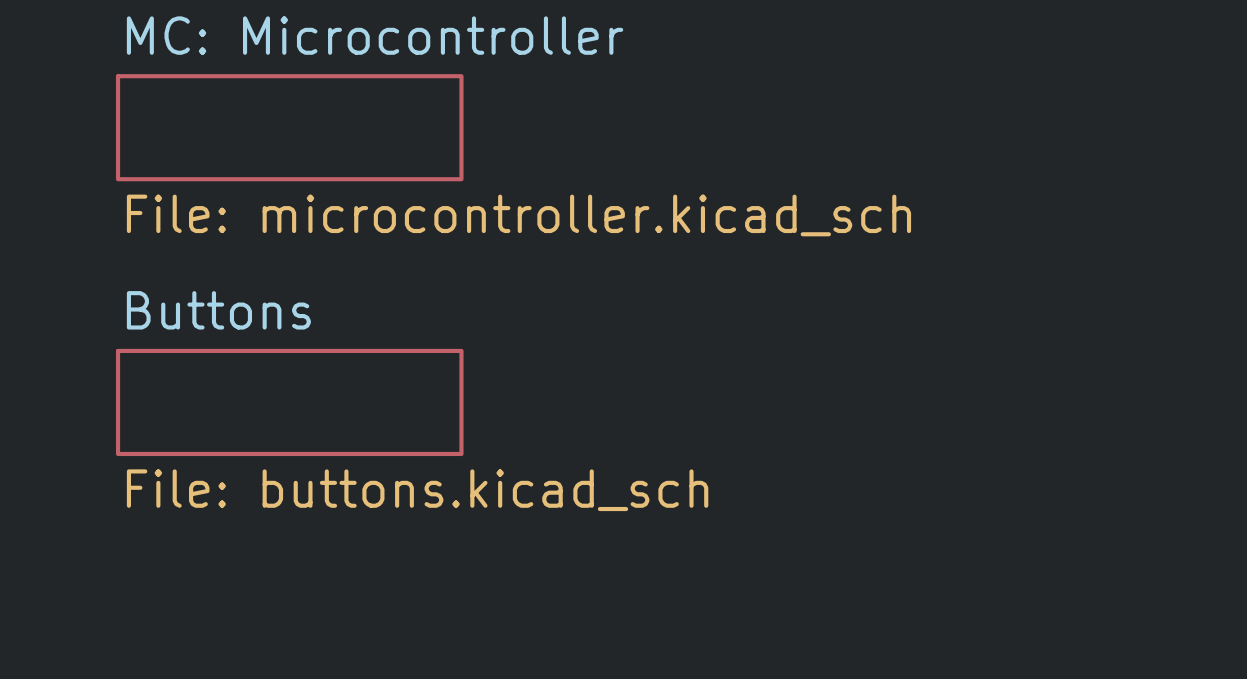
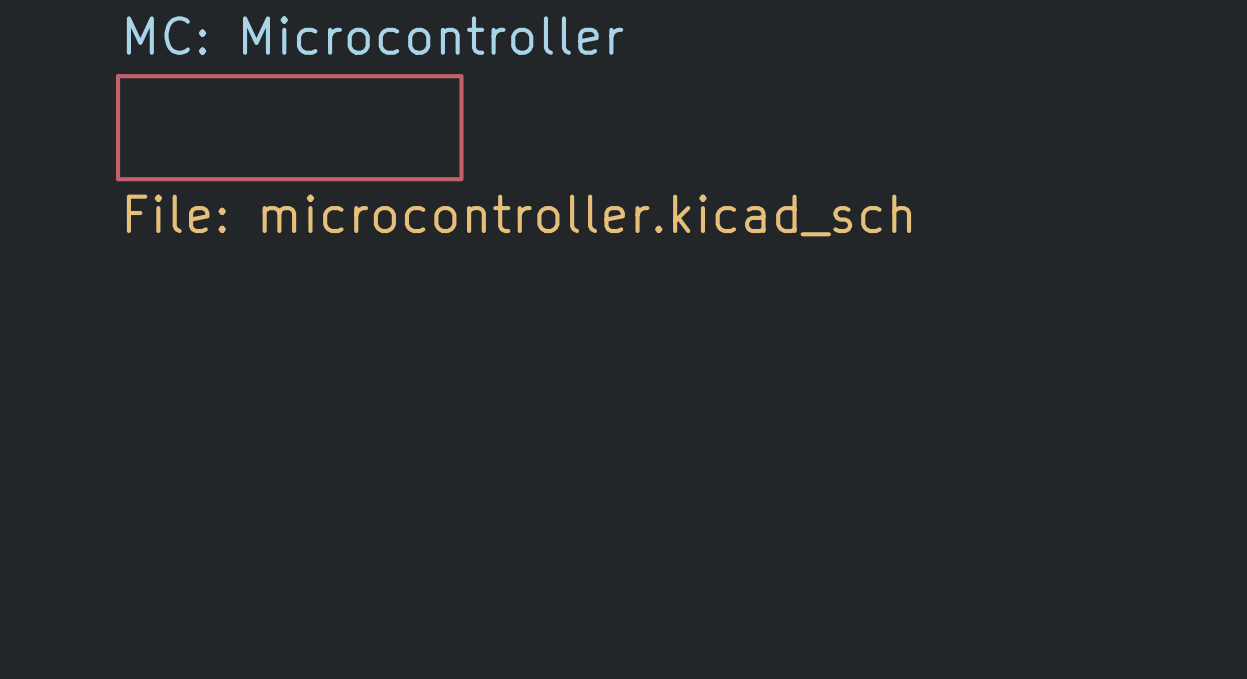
sheet Buttons: File: buttons.kicad_sch (289, 402) -> none

